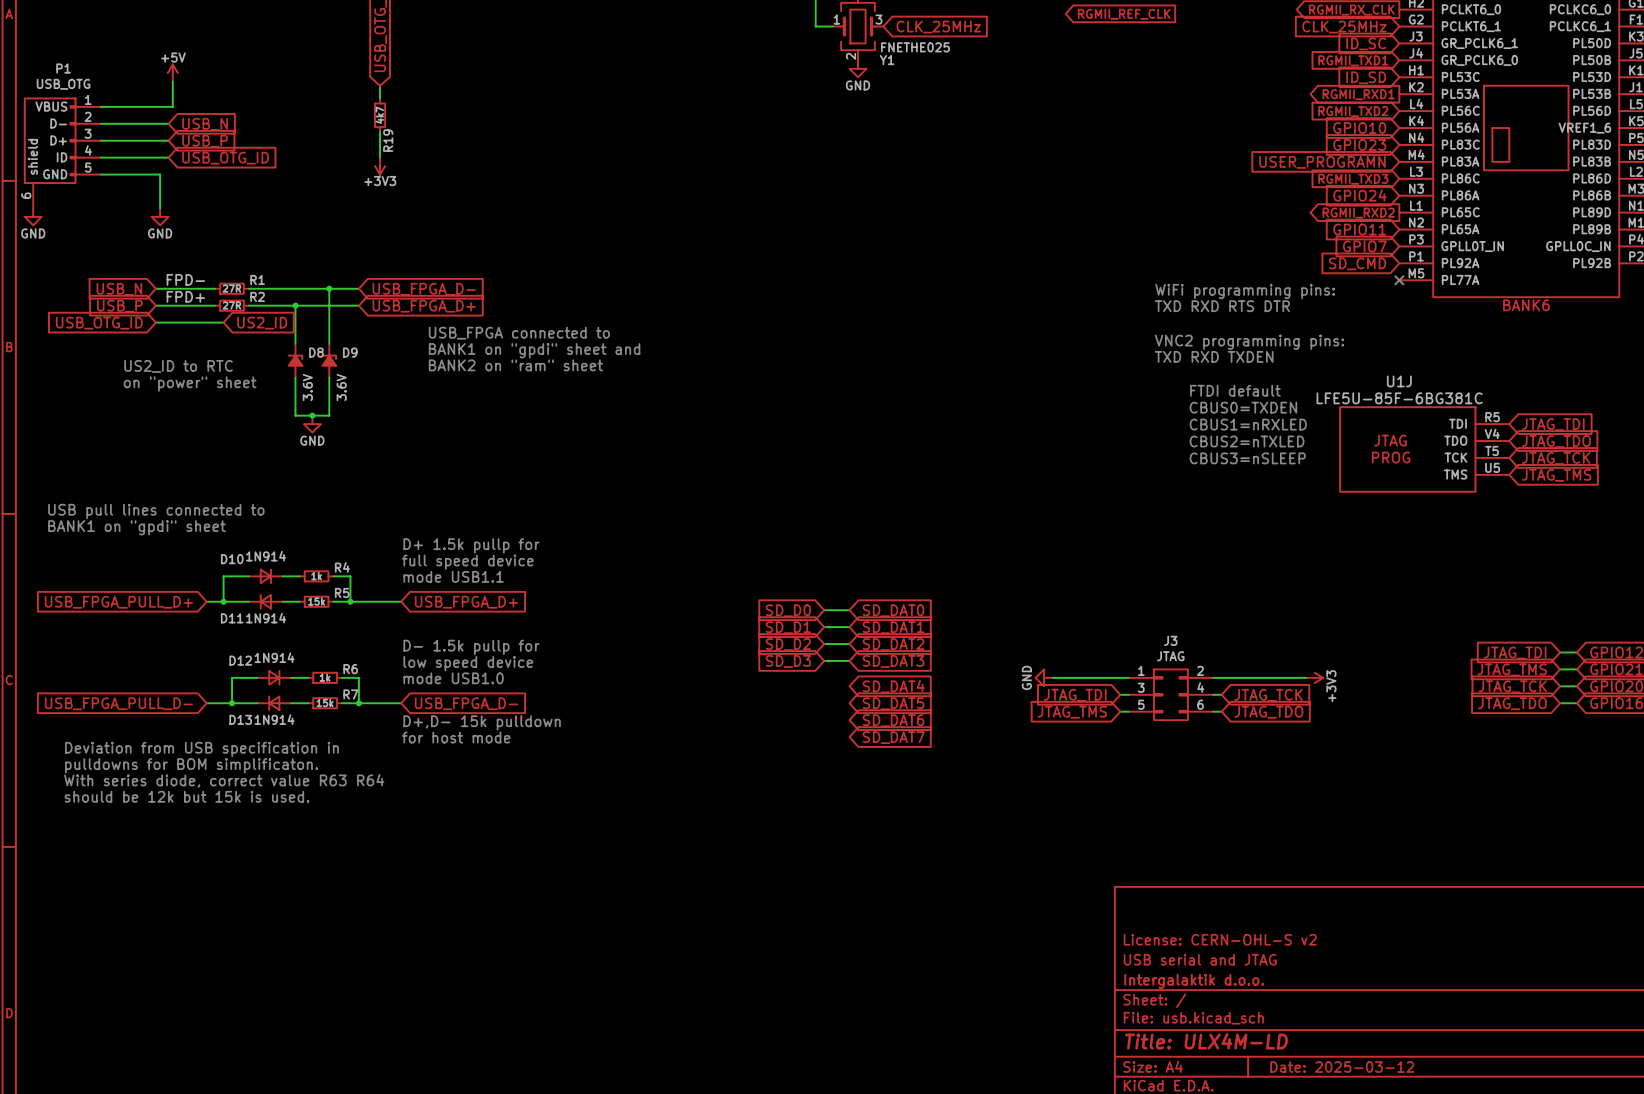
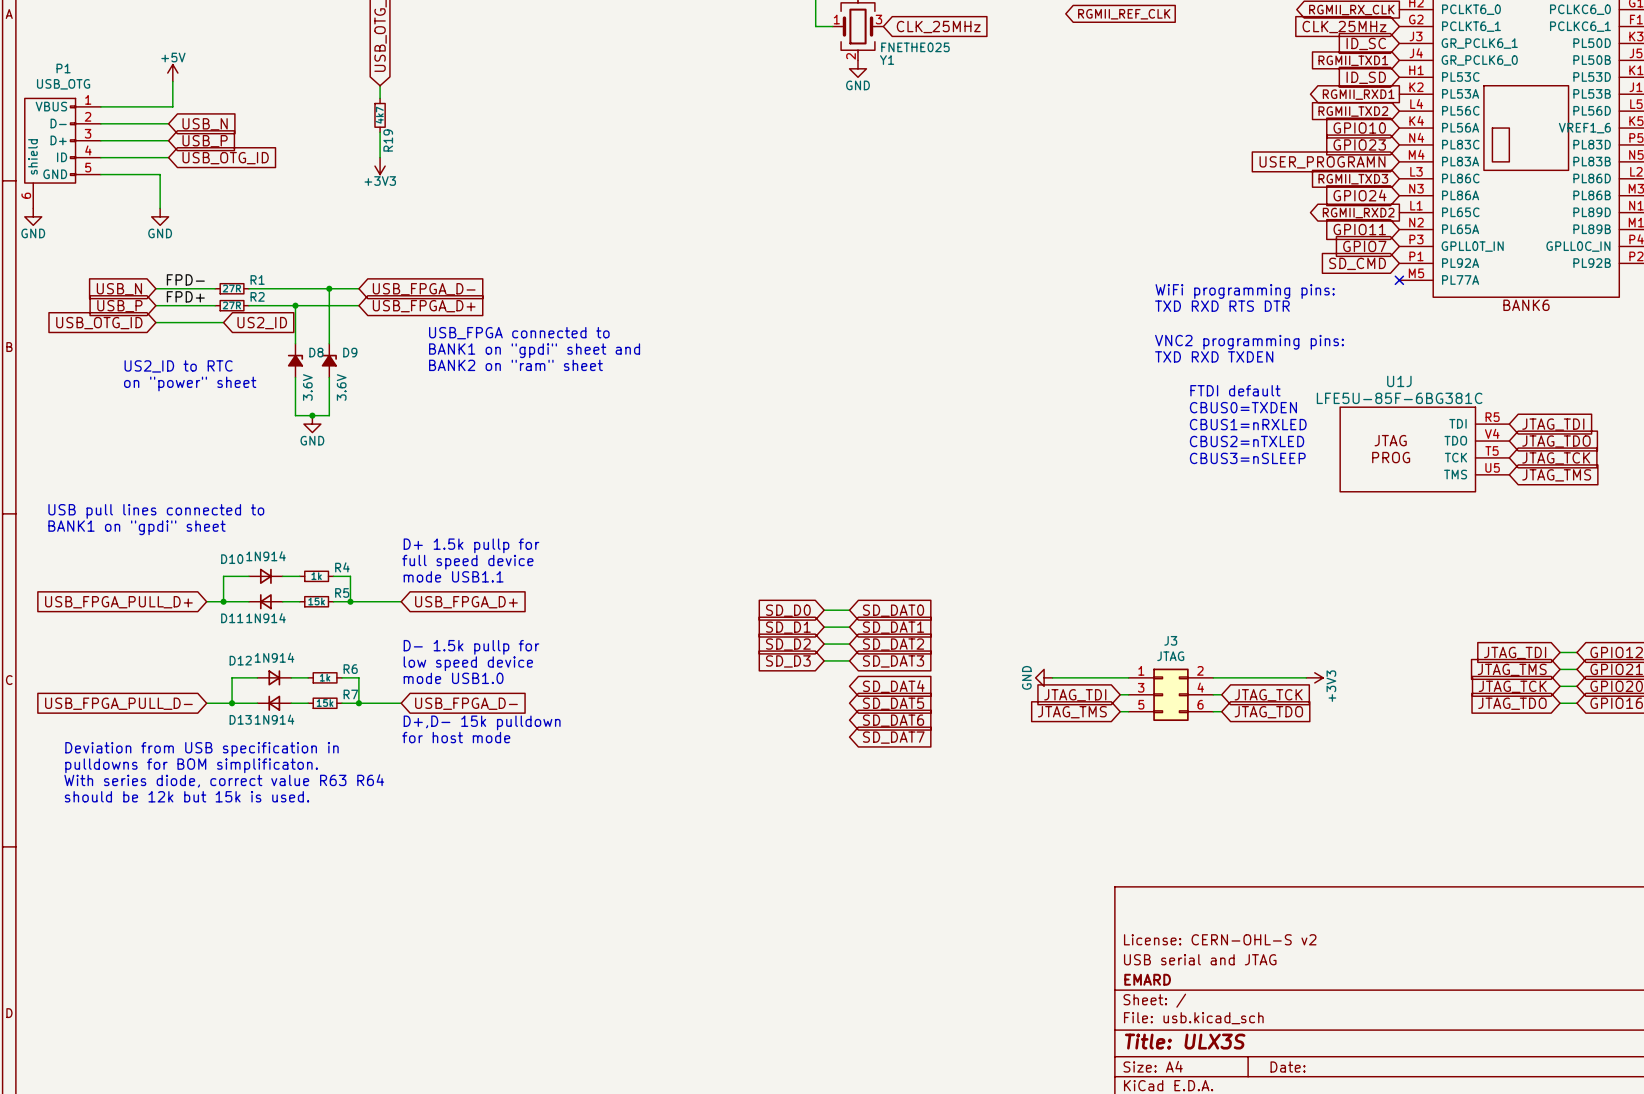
title block: Intergalaktik d.o.o. (1194, 981) -> EMARD (1147, 979)
title block: Title: ULX4M-LD (1206, 1041) -> Title: ULX3S (1185, 1041)
title block: Date: 2025-03-12 (1342, 1067) -> Date: (1288, 1067)

